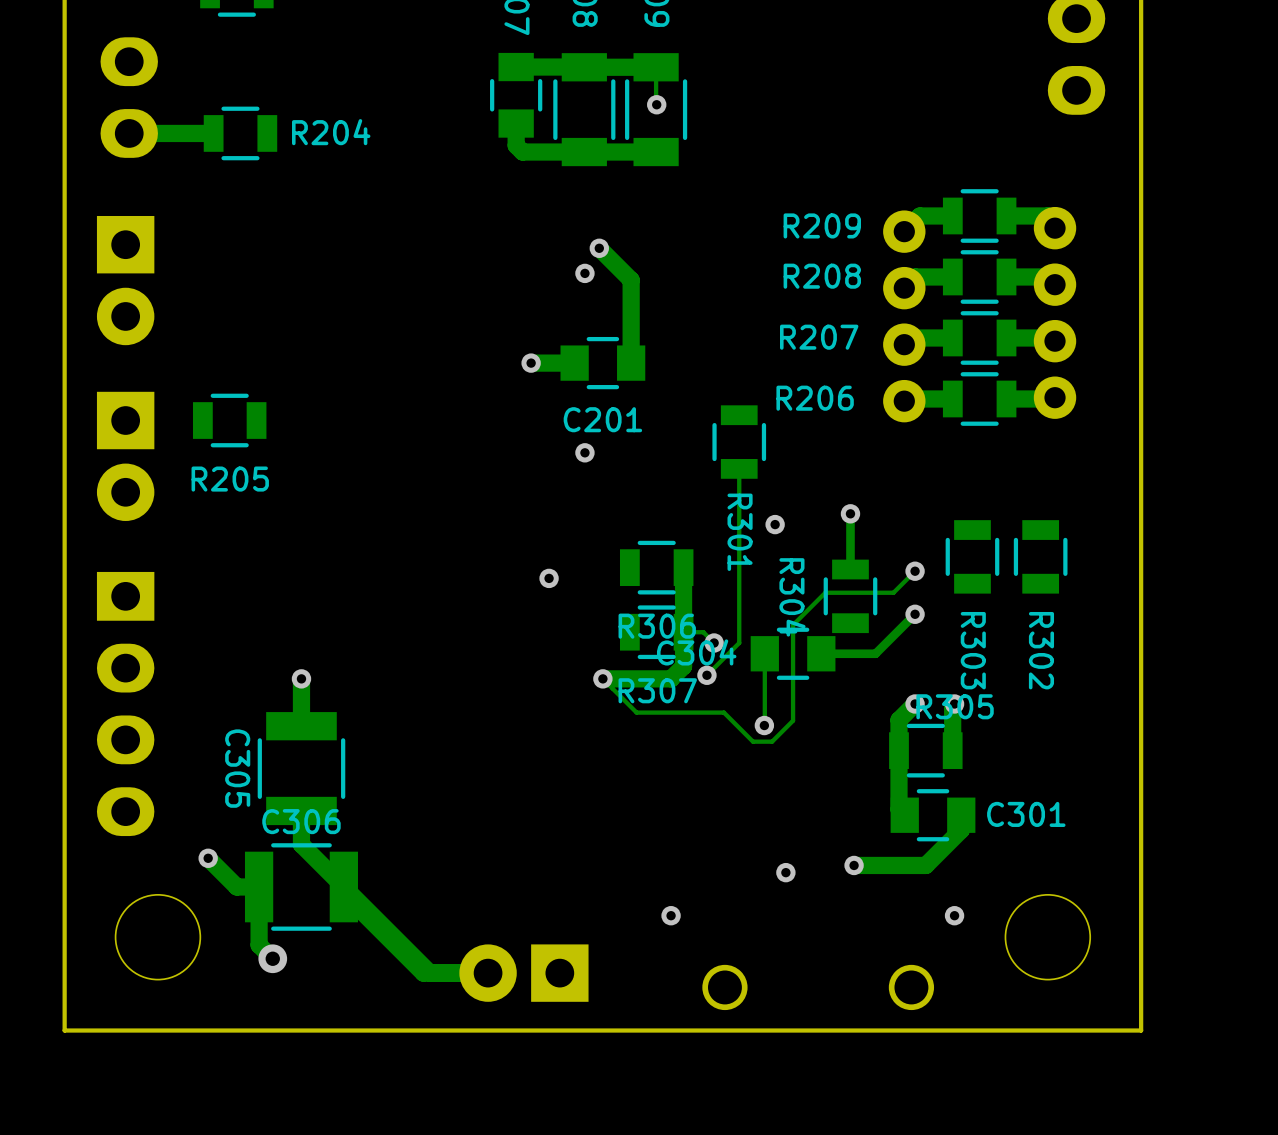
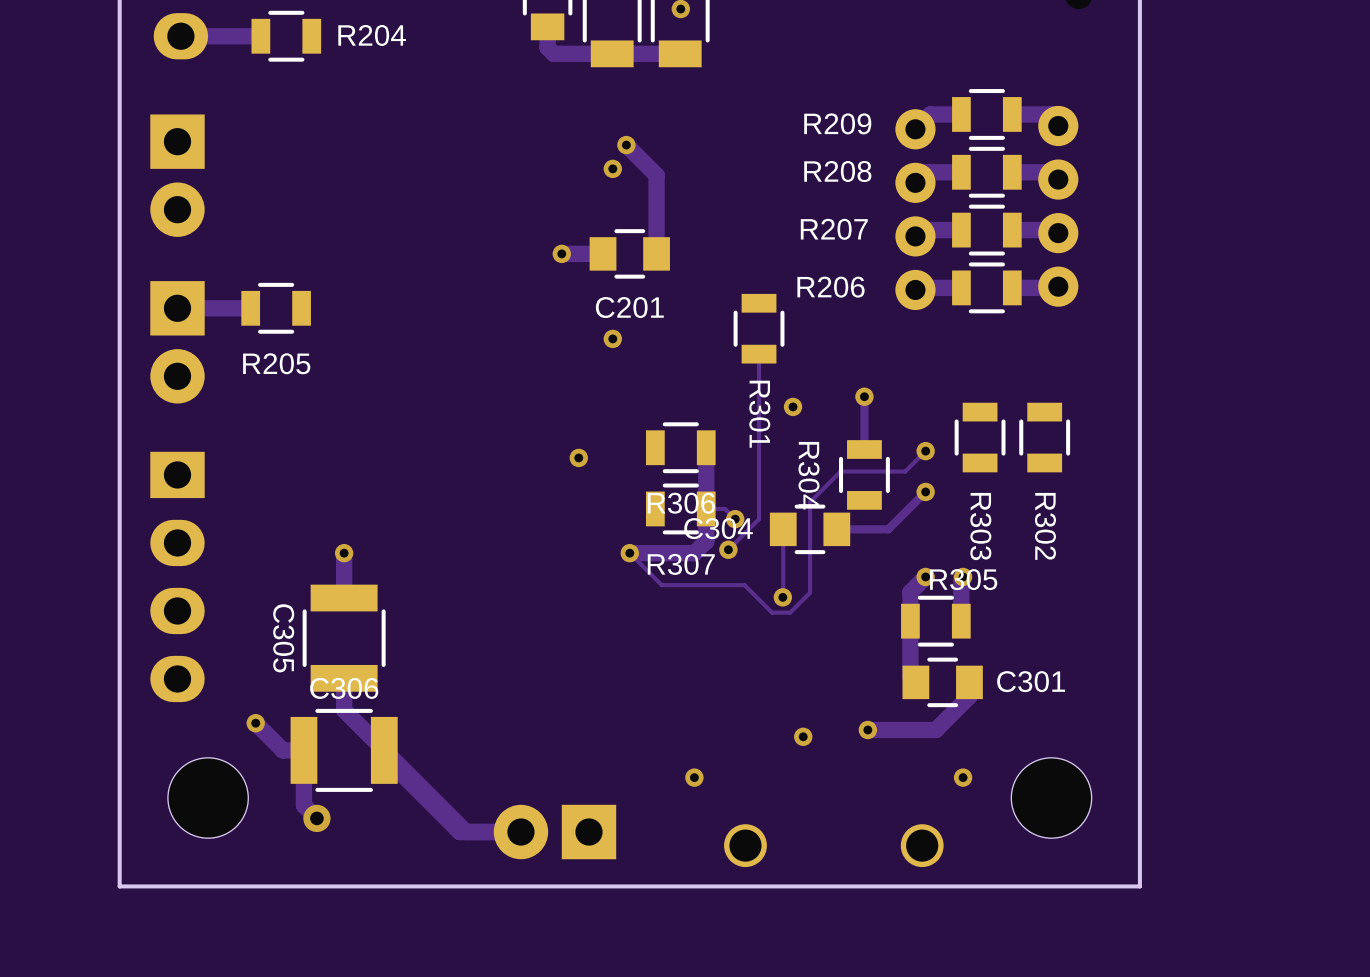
track: none -> (250, 308) (177, 308)

